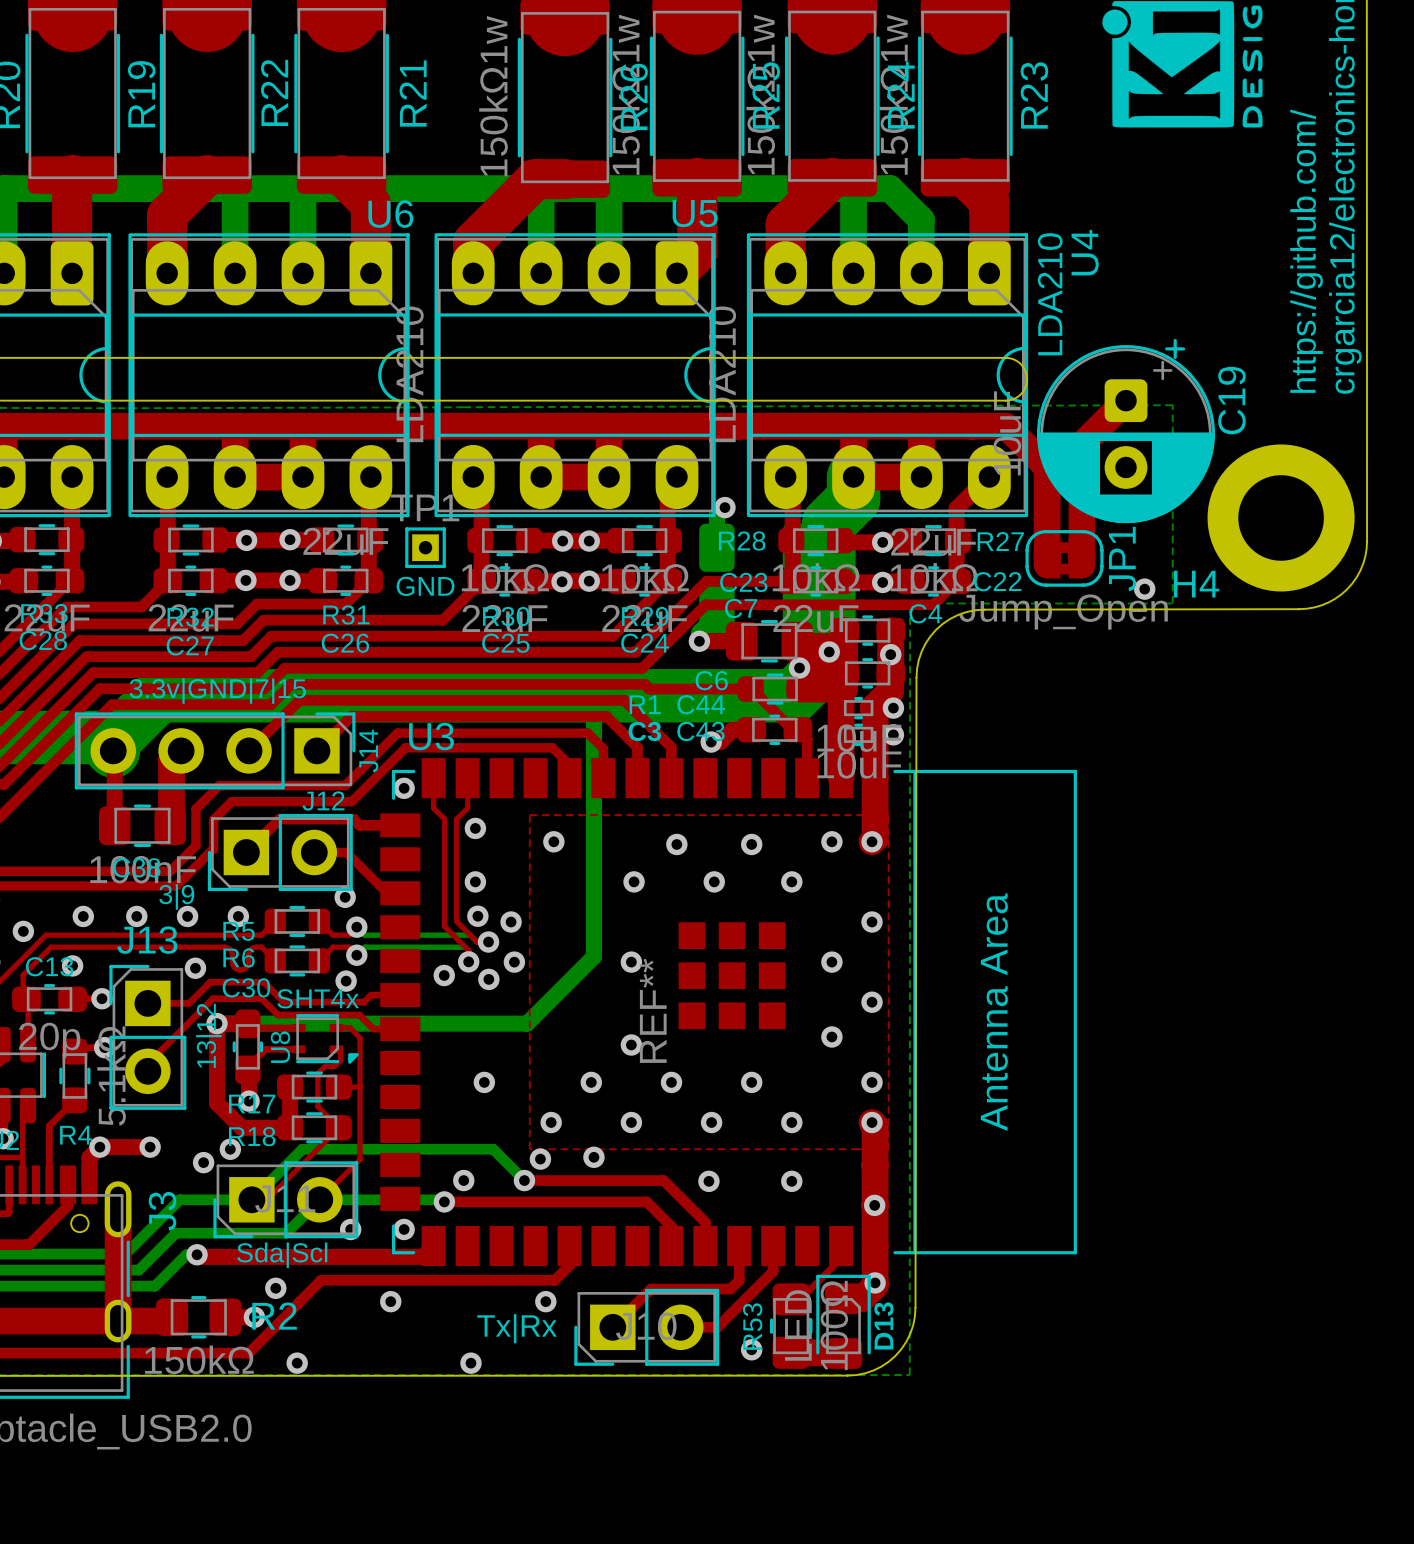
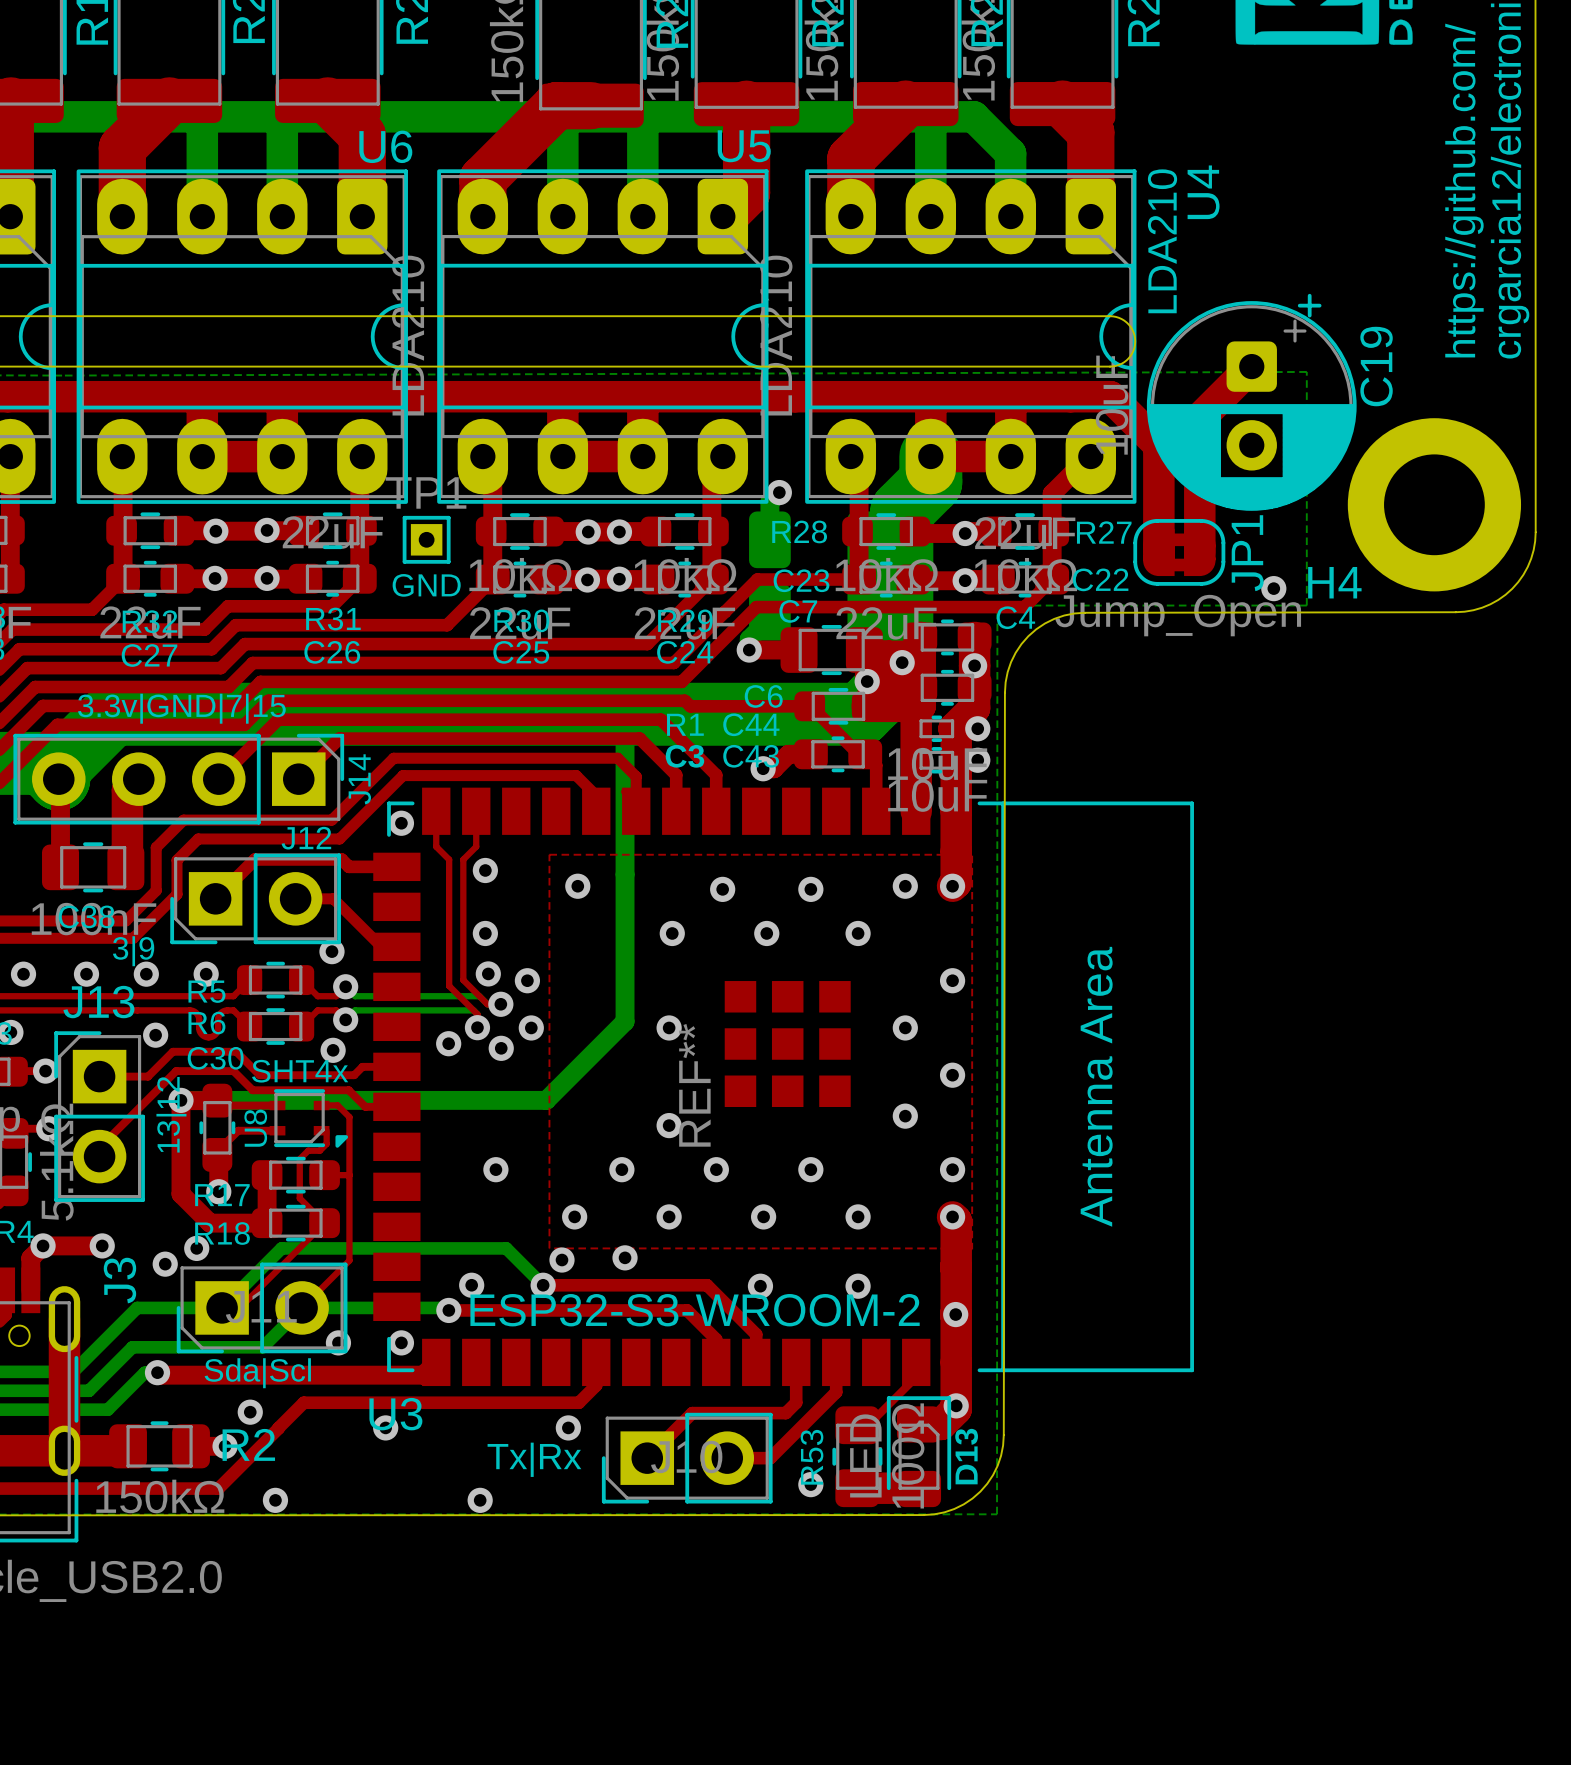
U3 name position: U3 (431, 736) -> U3 (395, 1414)
U3 value: none -> ESP32-S3-WROOM-2 (695, 1310)
J3 name position: J3 (162, 1211) -> J3 (119, 1280)

